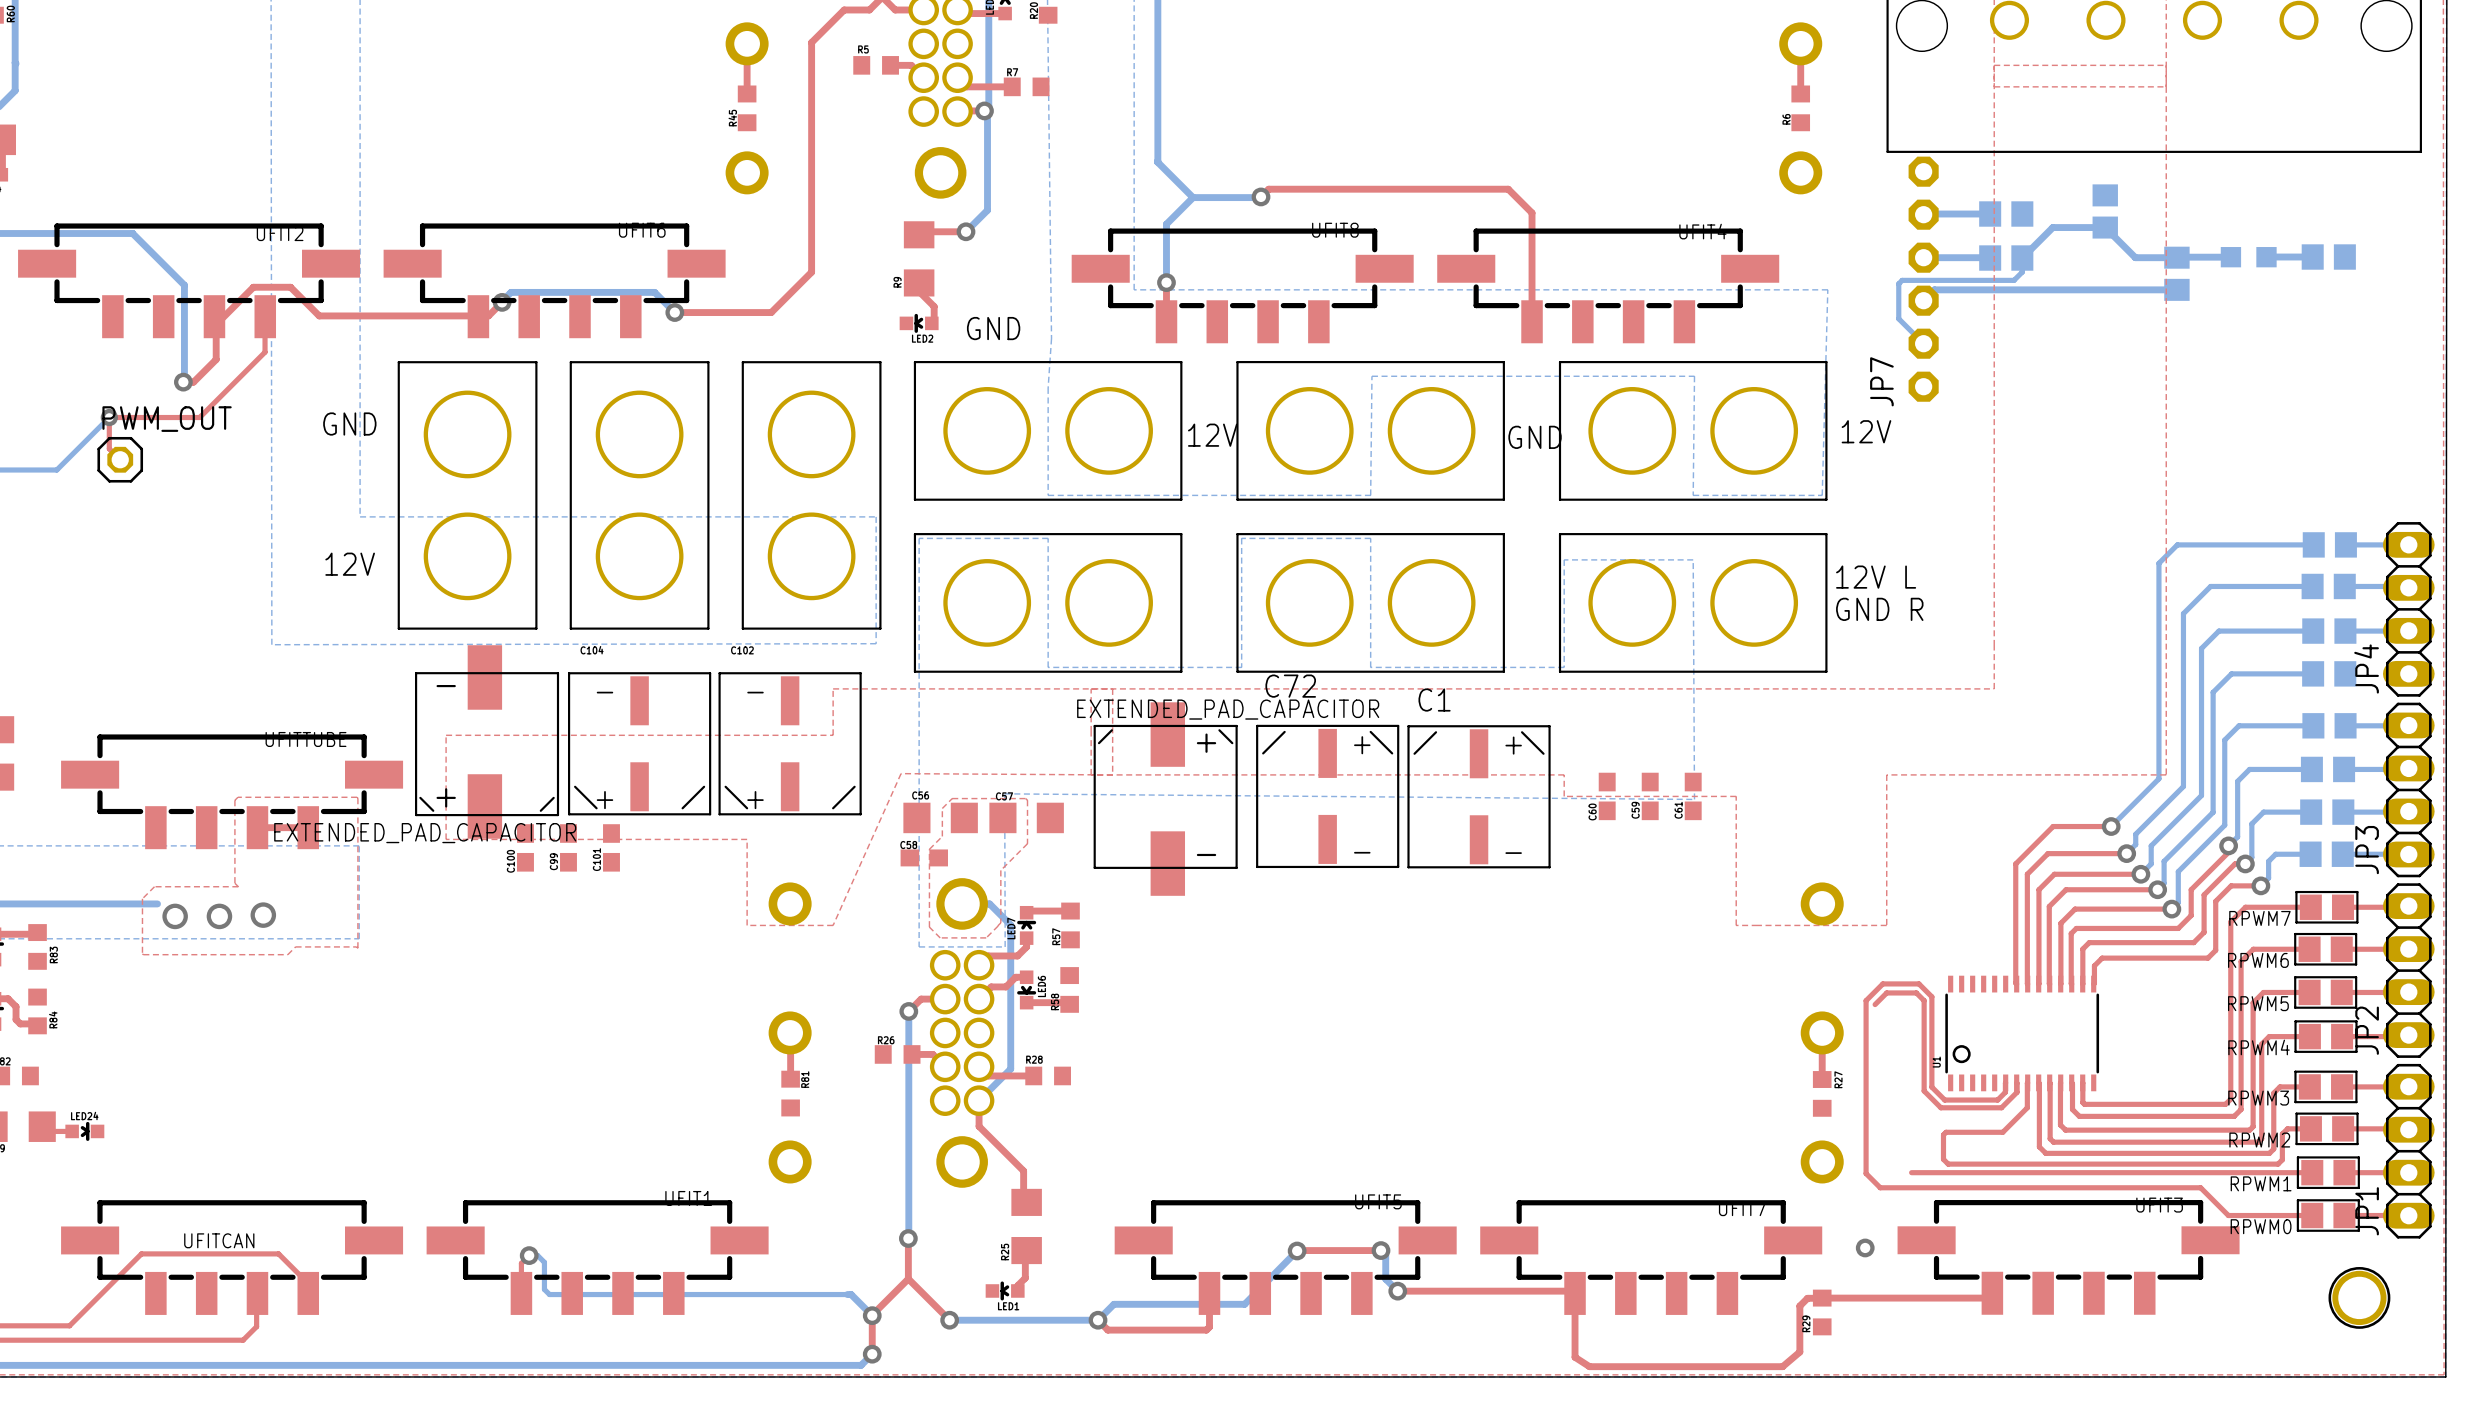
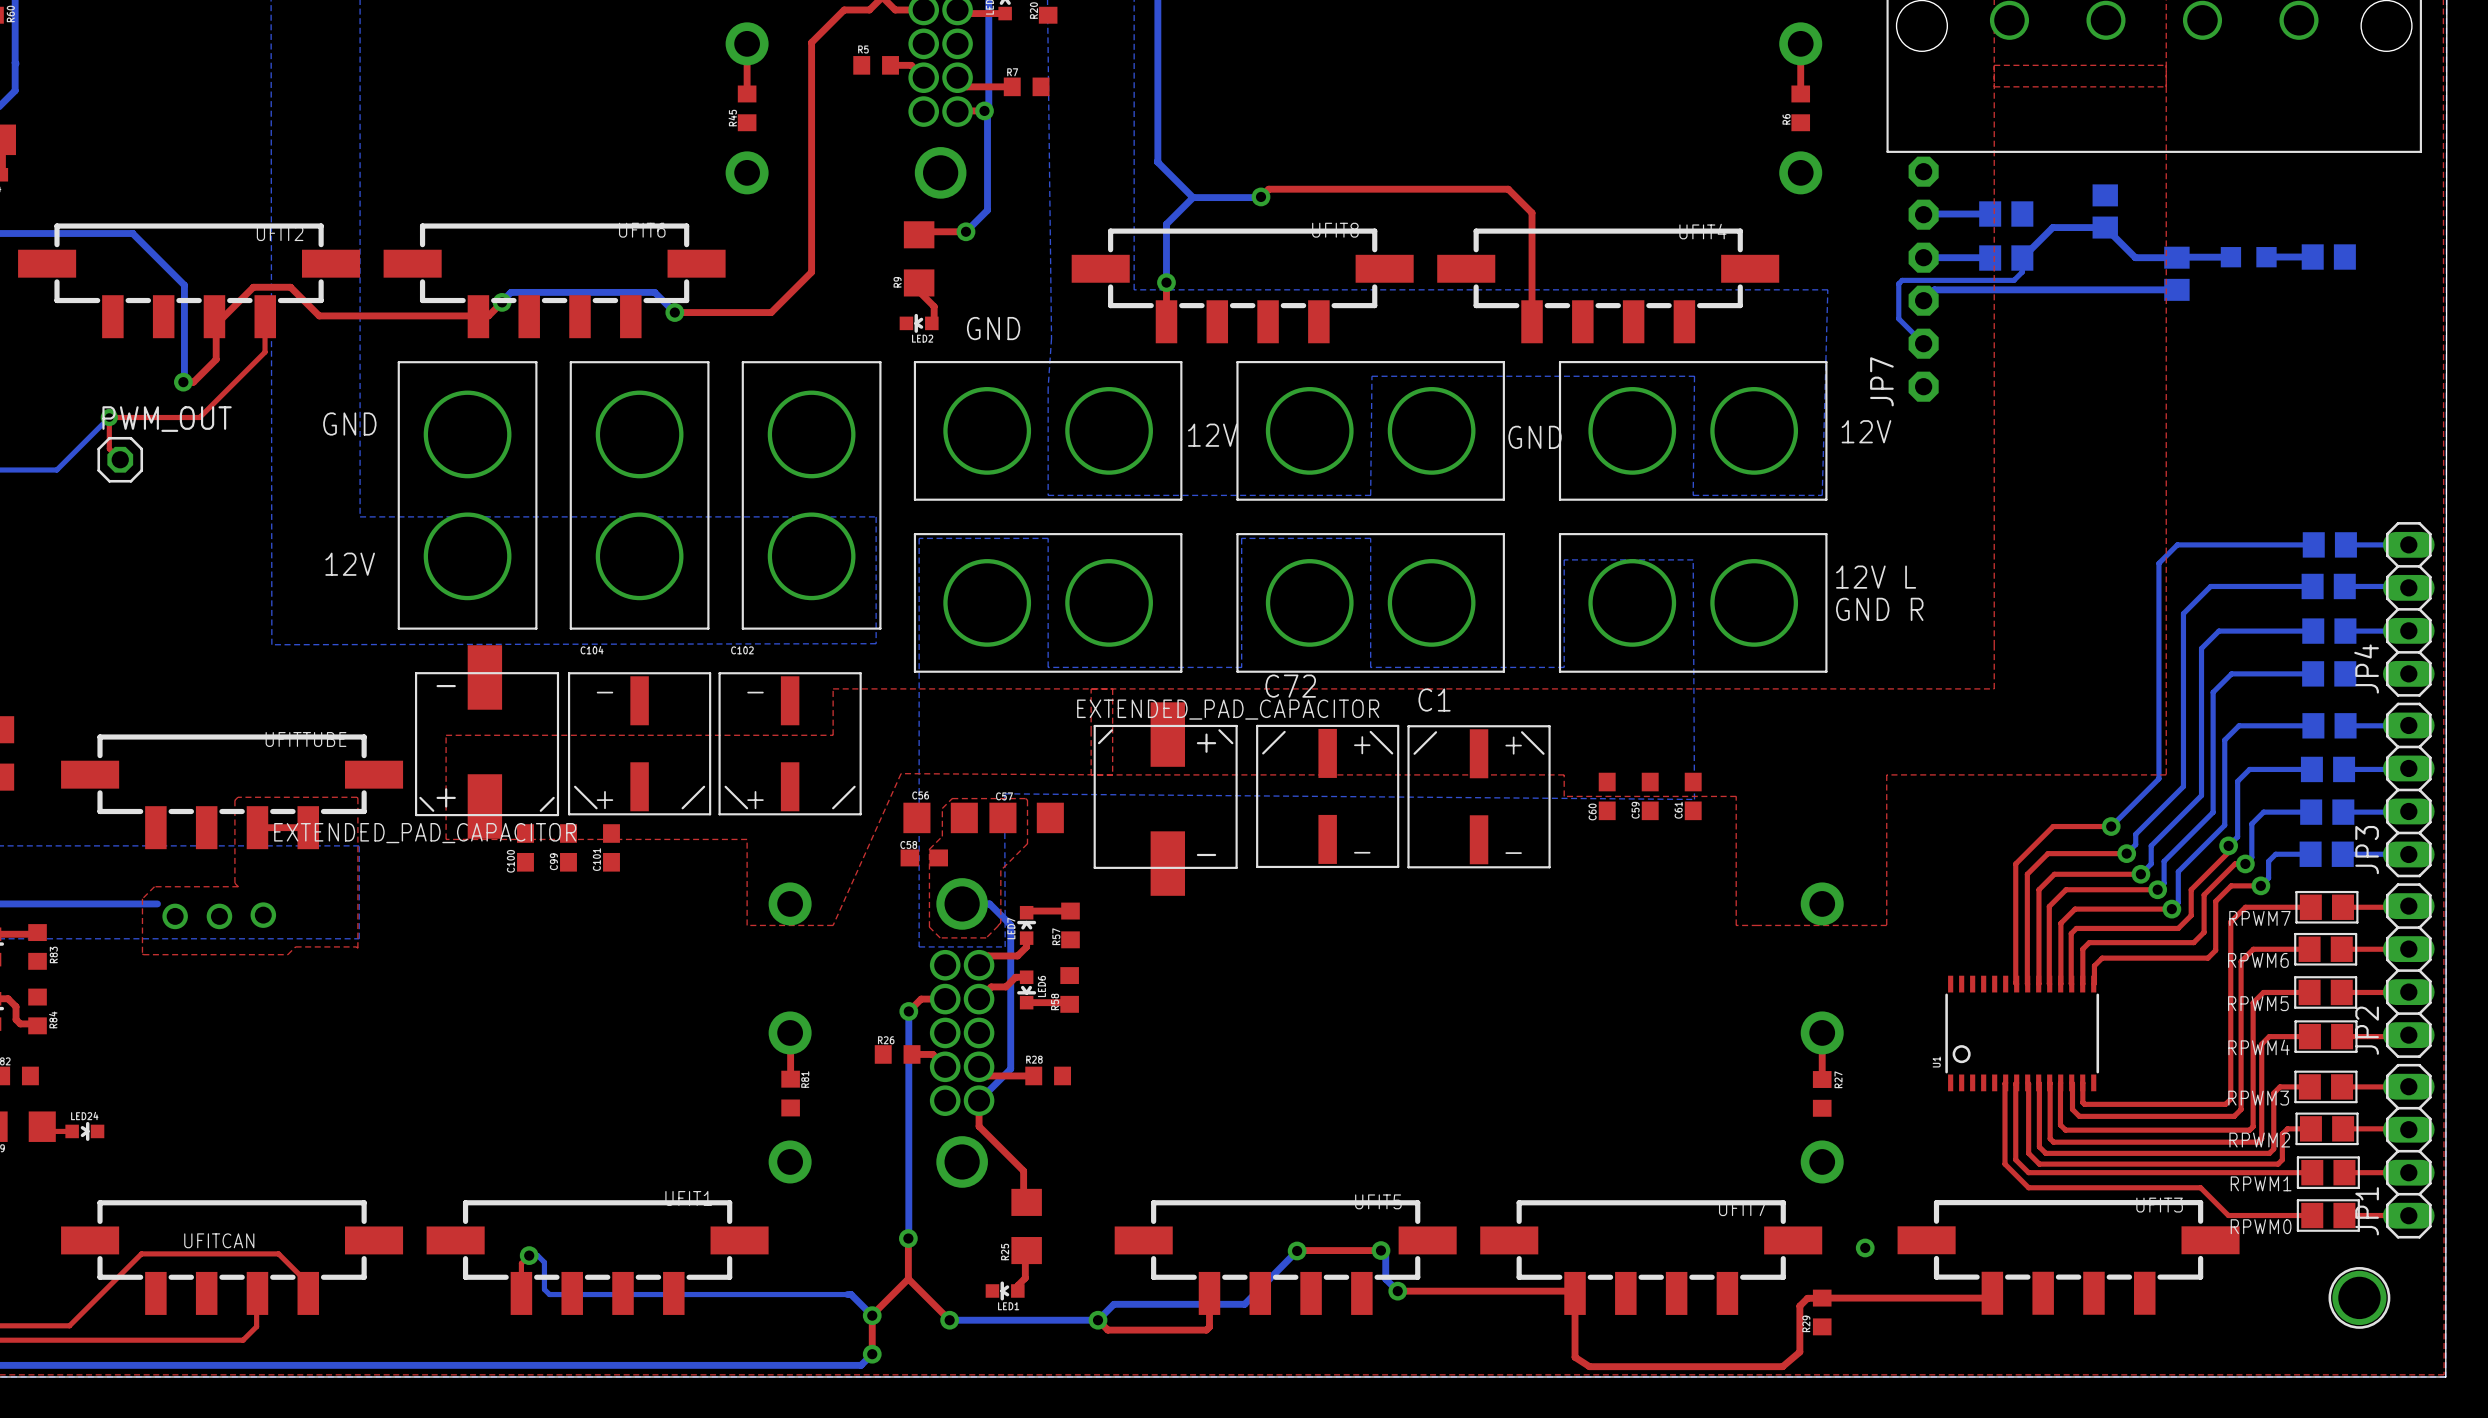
top track: (1875, 1004) (1886, 992) (1916, 992) (1924, 1000) (1924, 1091) (1940, 1107) (2001, 1107) (2017, 1092) (2016, 1082) -> none
top track: (2027, 1082) (2027, 1107) (2002, 1132) (1946, 1132) (1943, 1134) (1943, 1159) (1948, 1164) (2039, 1164) -> (2027, 1082) (2028, 1153) (2039, 1164)
top track: (2005, 1083) (2005, 1092) (1997, 1100) (1944, 1100) (1931, 1087) (1931, 996) (1918, 983) (1882, 983) (1866, 1000) (1866, 1173) (1880, 1187) (2028, 1187) -> (2005, 1083) (2004, 1164) (2028, 1187)
top track: (1911, 1172) (2028, 1172) -> (2016, 1082) (2015, 1159) (2028, 1172)

